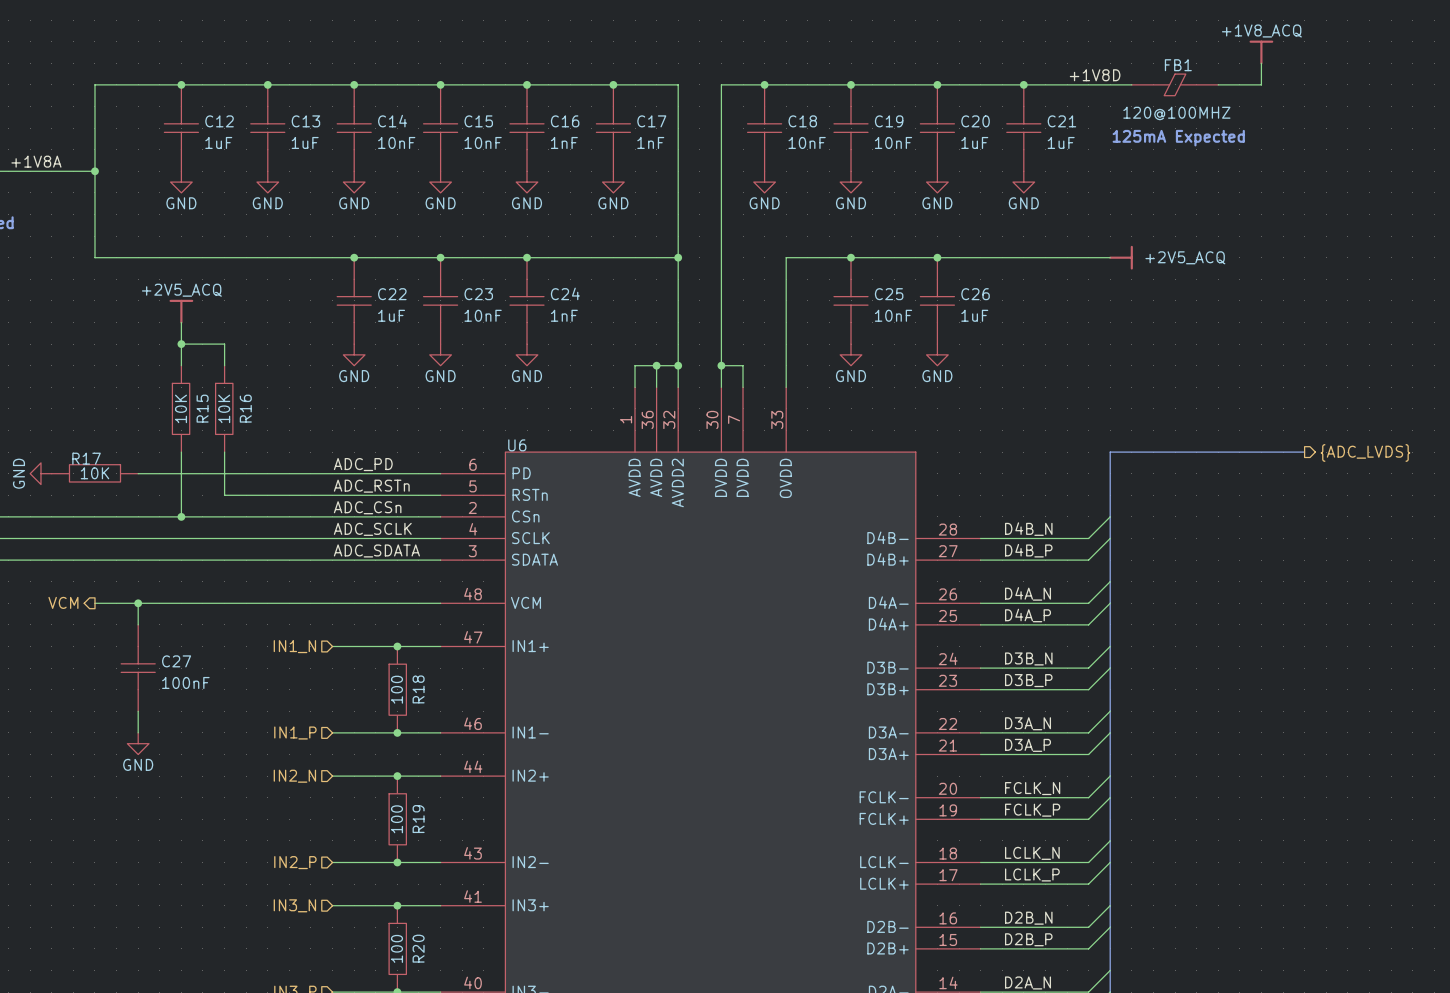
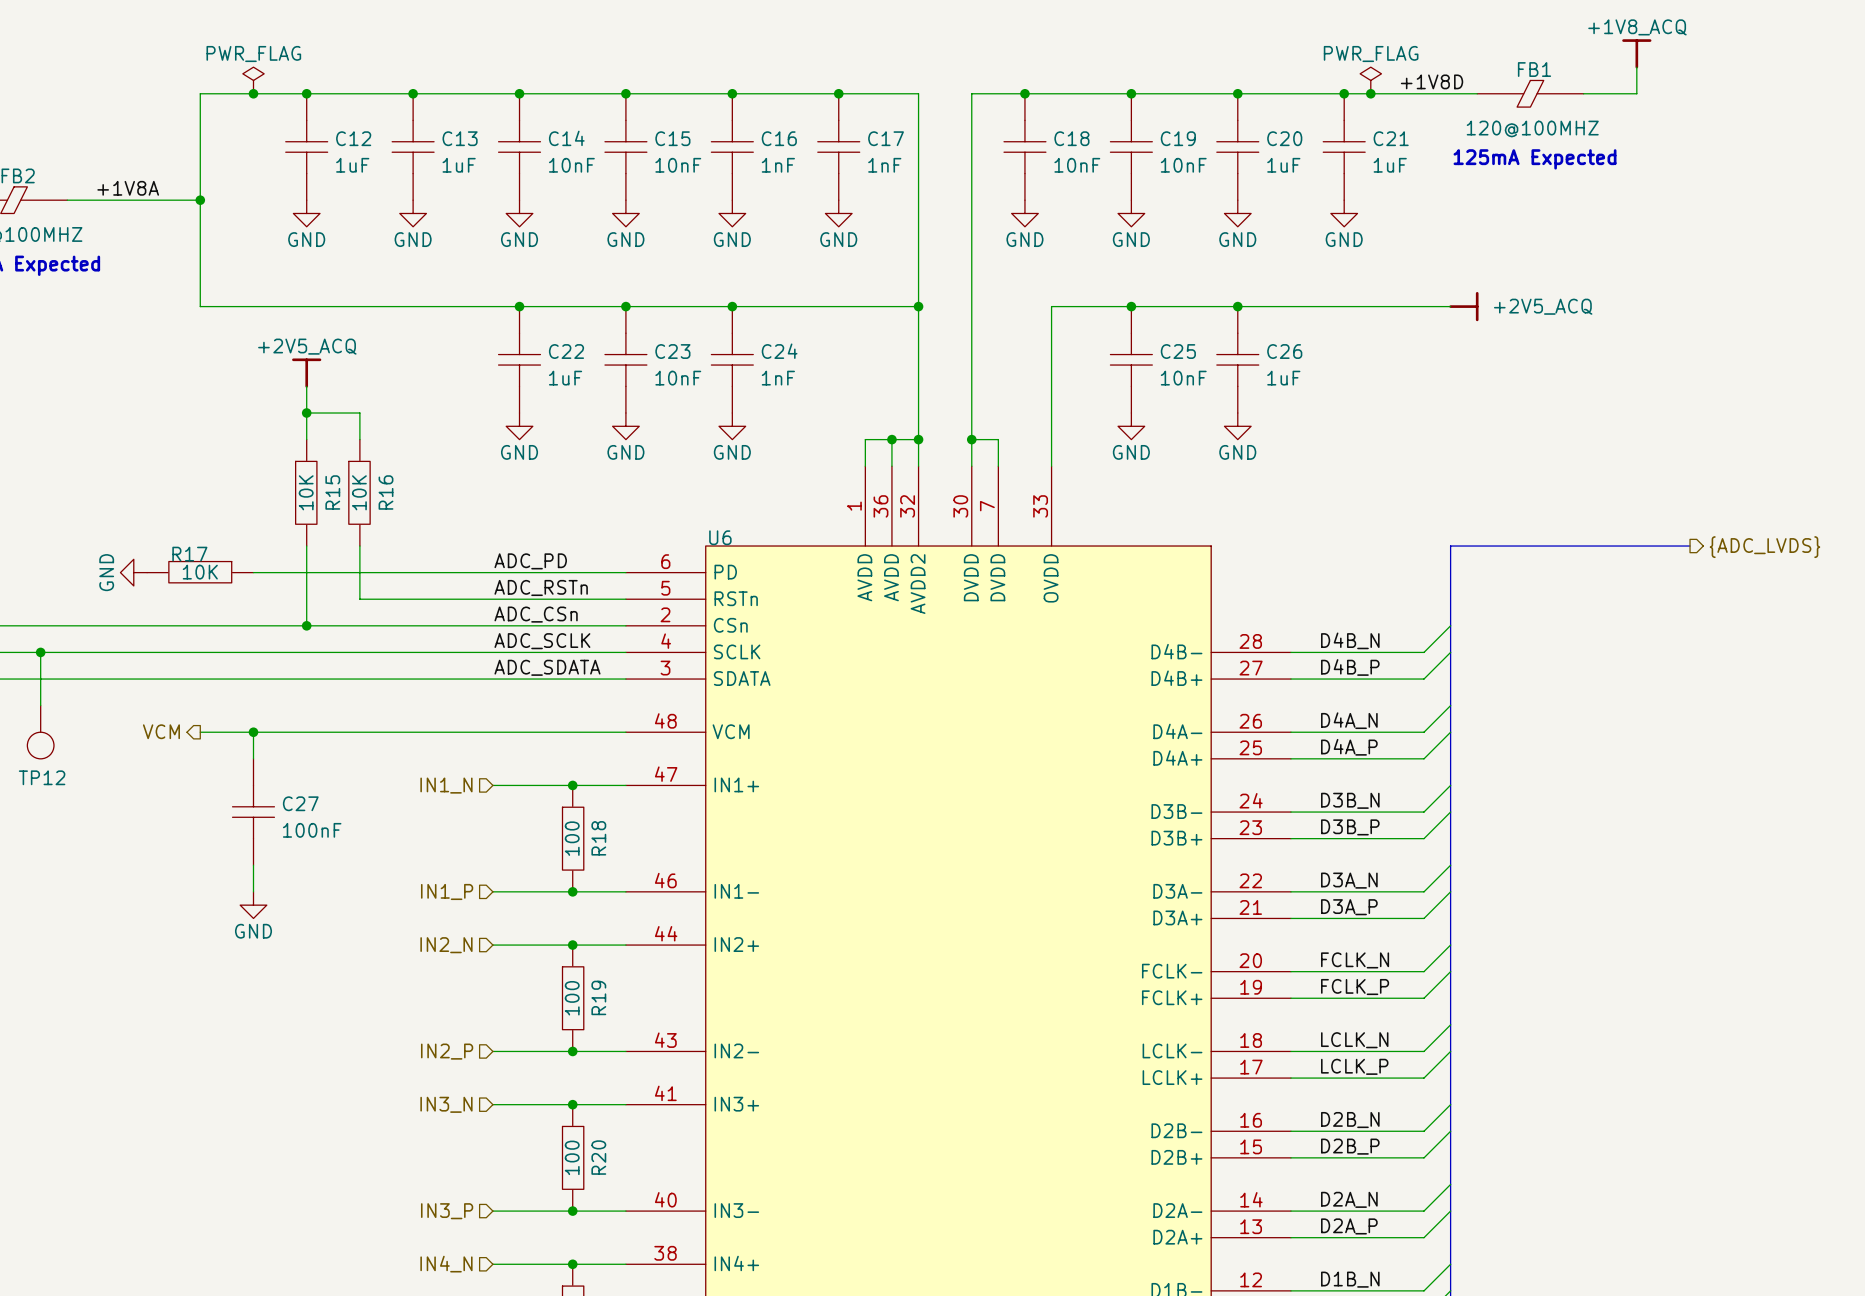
power symbol: none -> PWR_FLAG (253, 80)
power symbol: none -> PWR_FLAG (1370, 80)
junction: none -> (253, 93)
junction: none -> (1370, 93)

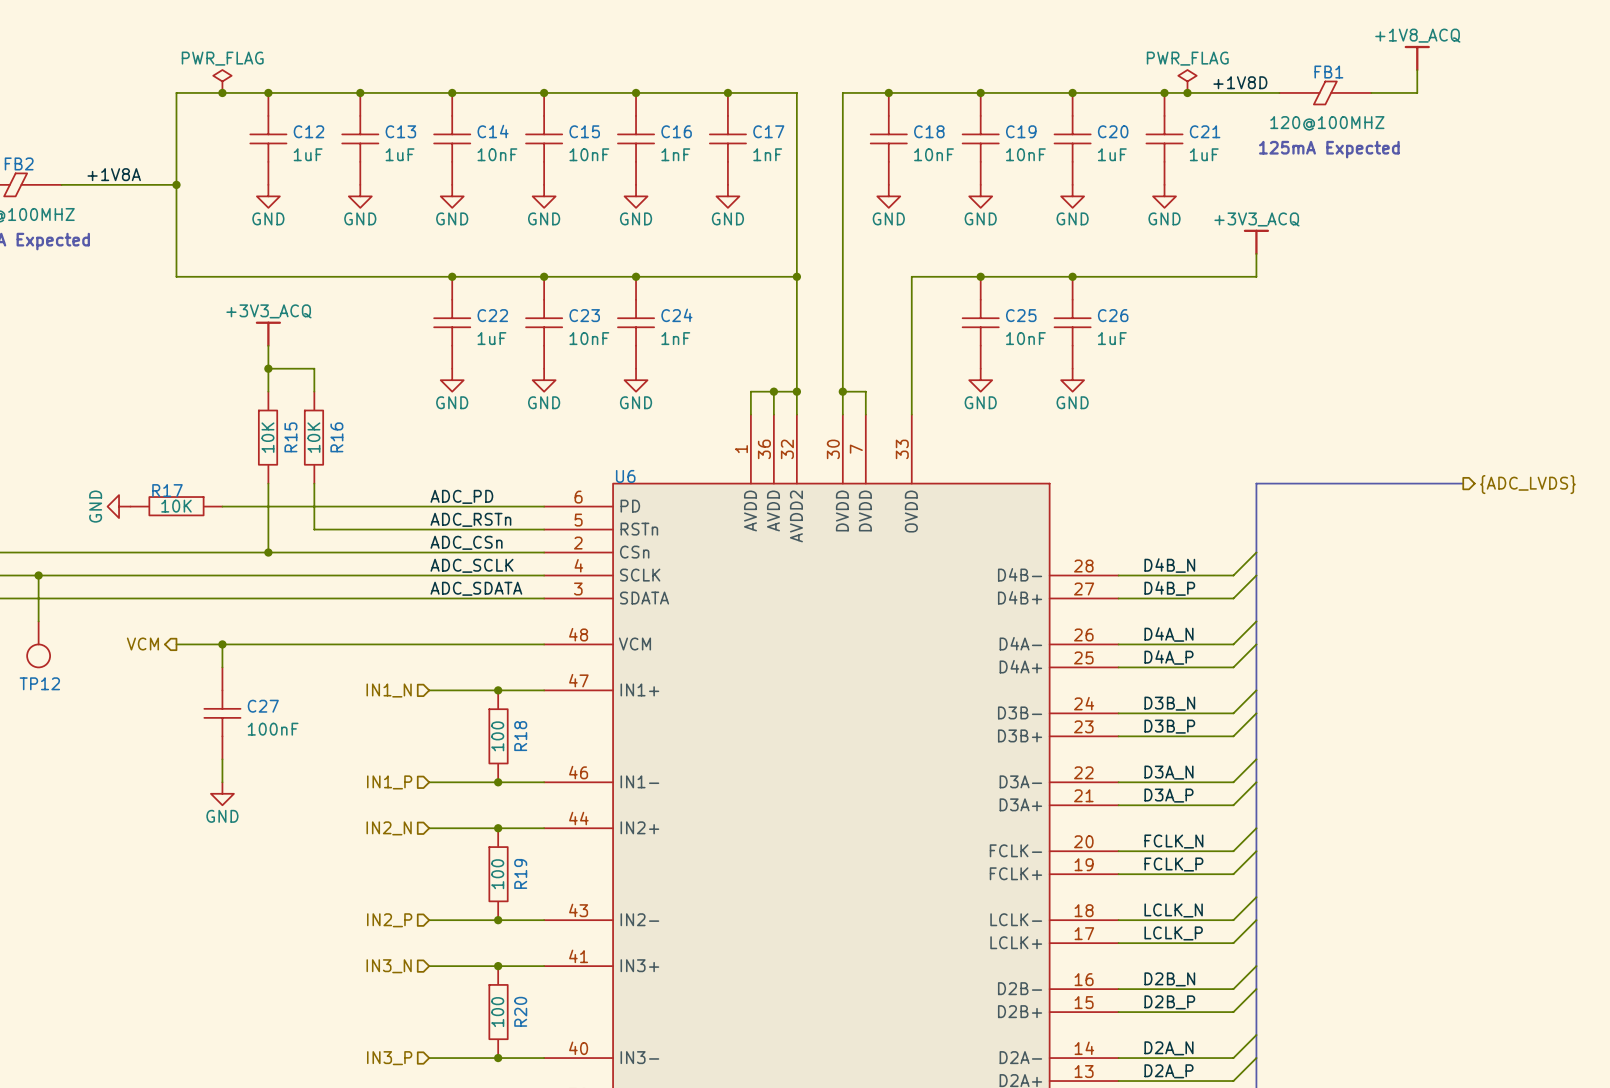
power symbol: none -> +3V3_ACQ (1256, 242)
wire: none -> (1256, 253) (1256, 276)
power symbol: +2V5_ACQ (1463, 306) -> none
power symbol: +2V5_ACQ (306, 373) -> +3V3_ACQ (268, 334)

